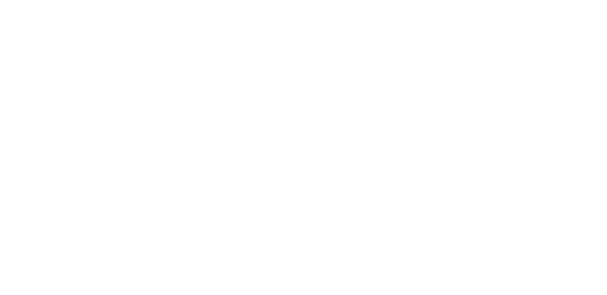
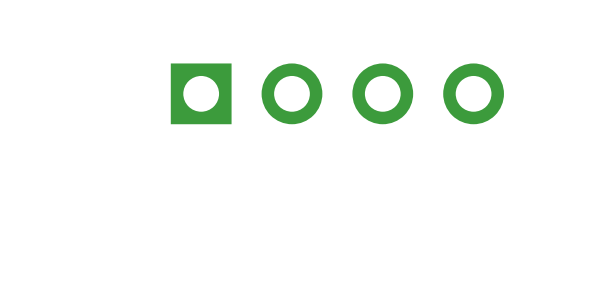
part: none -> (337, 93)

